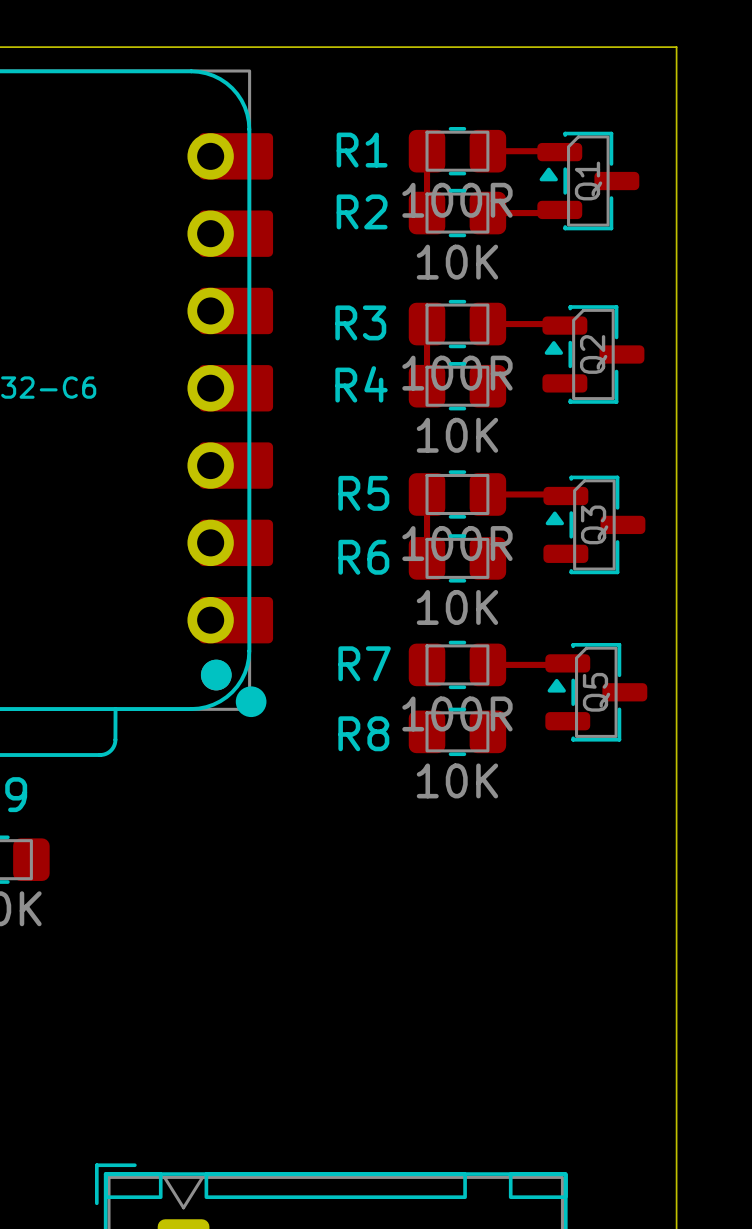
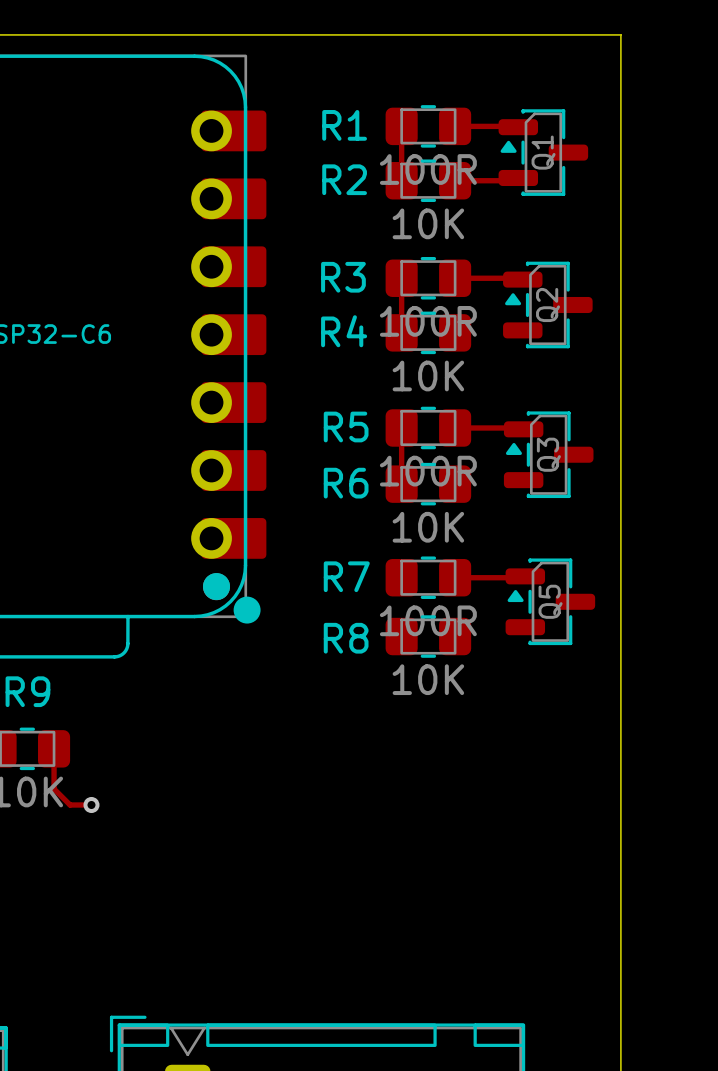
track: none -> (54, 746) (54, 788) (70, 805) (91, 805)
via: none -> (91, 805)

